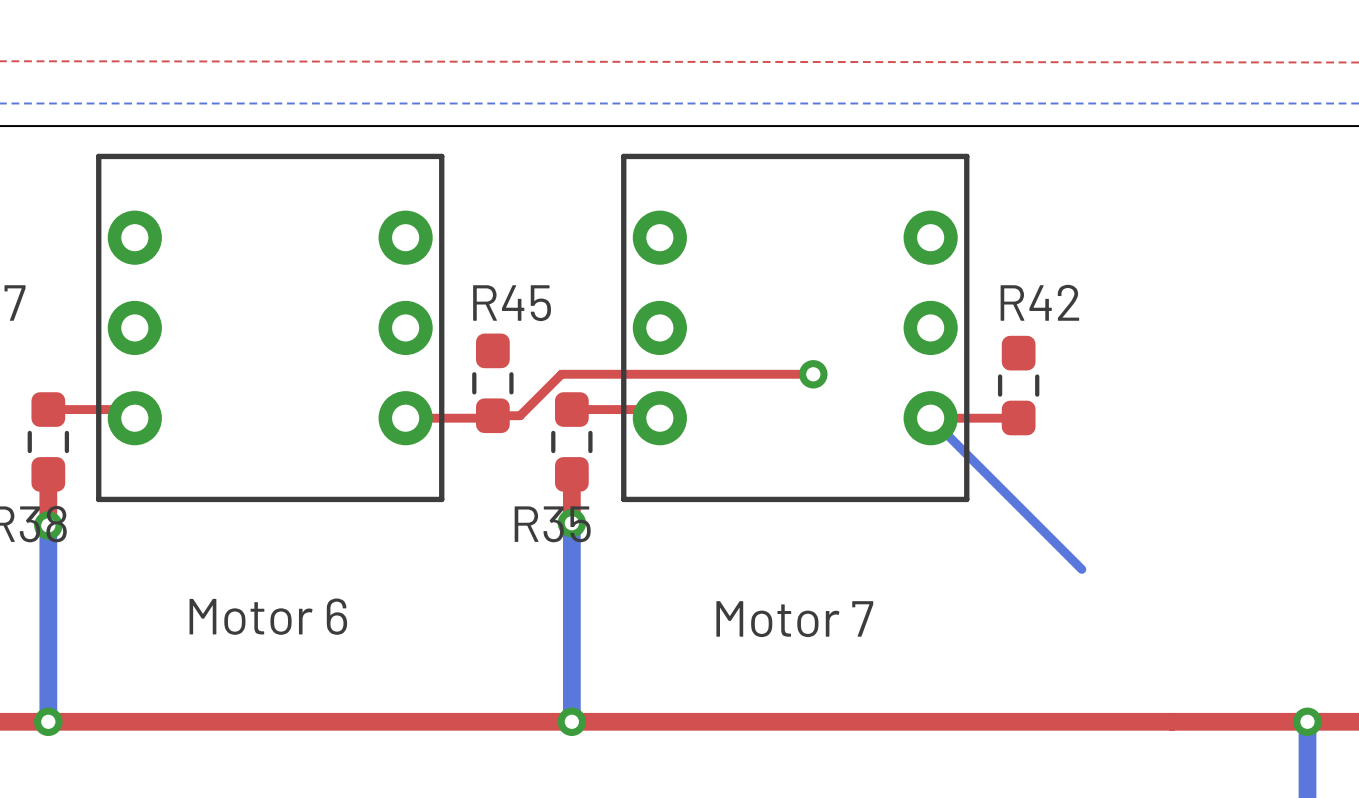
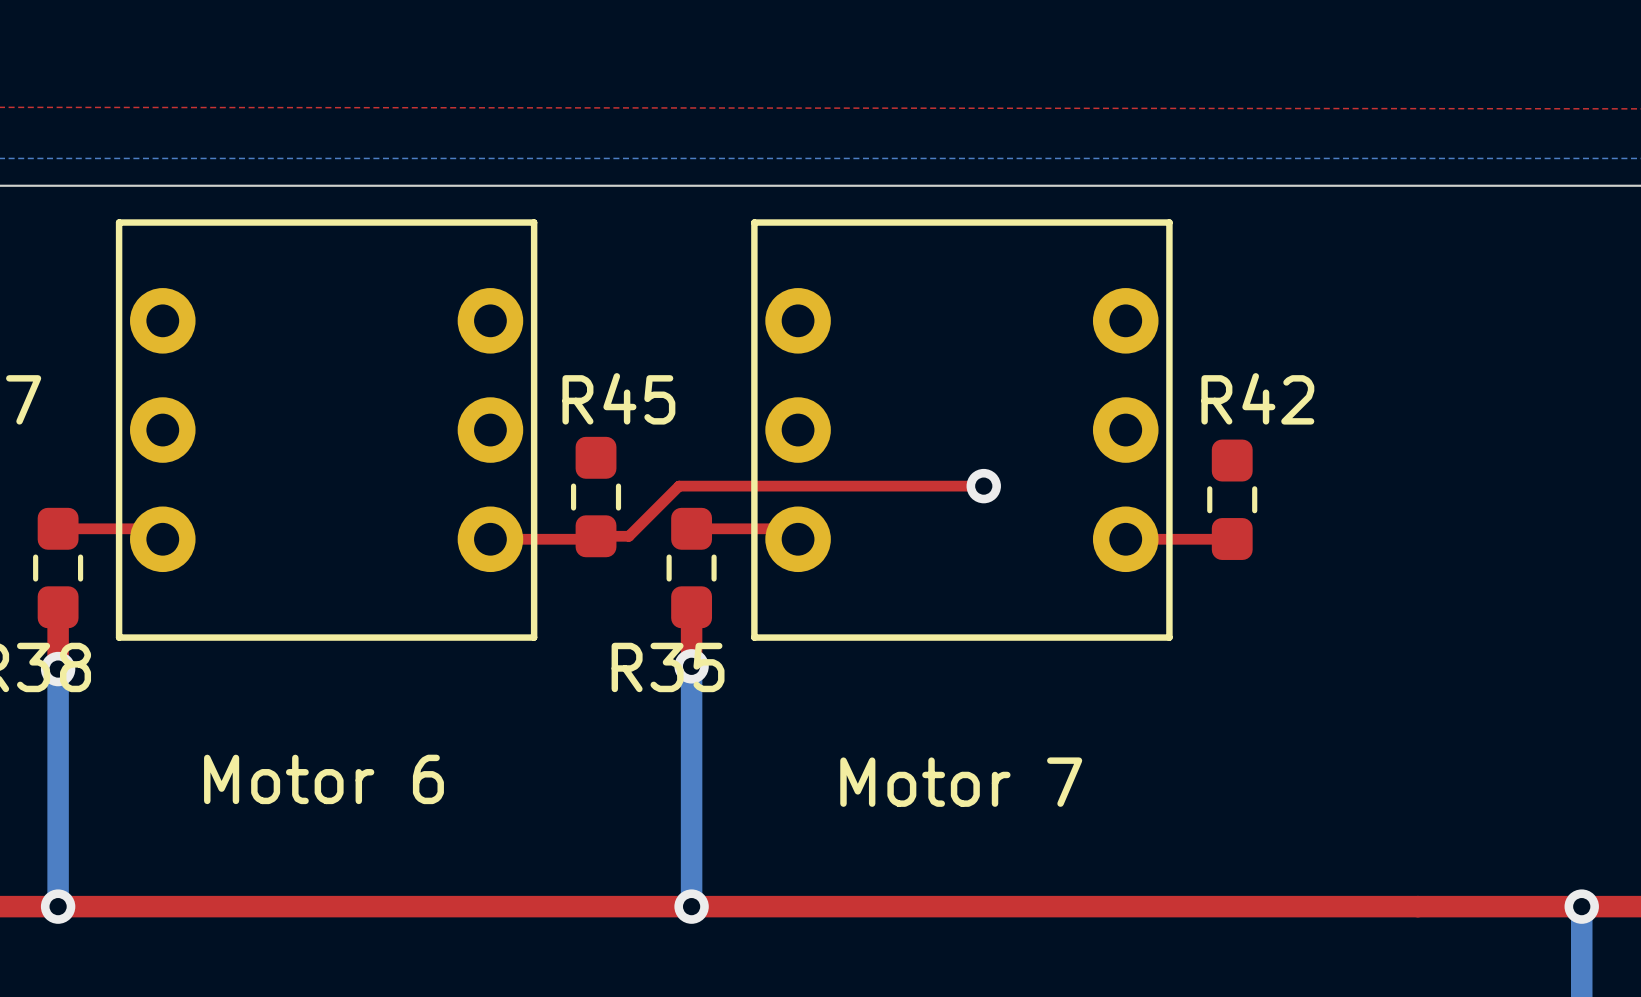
bottom track: (930, 418) (1081, 569) -> none

